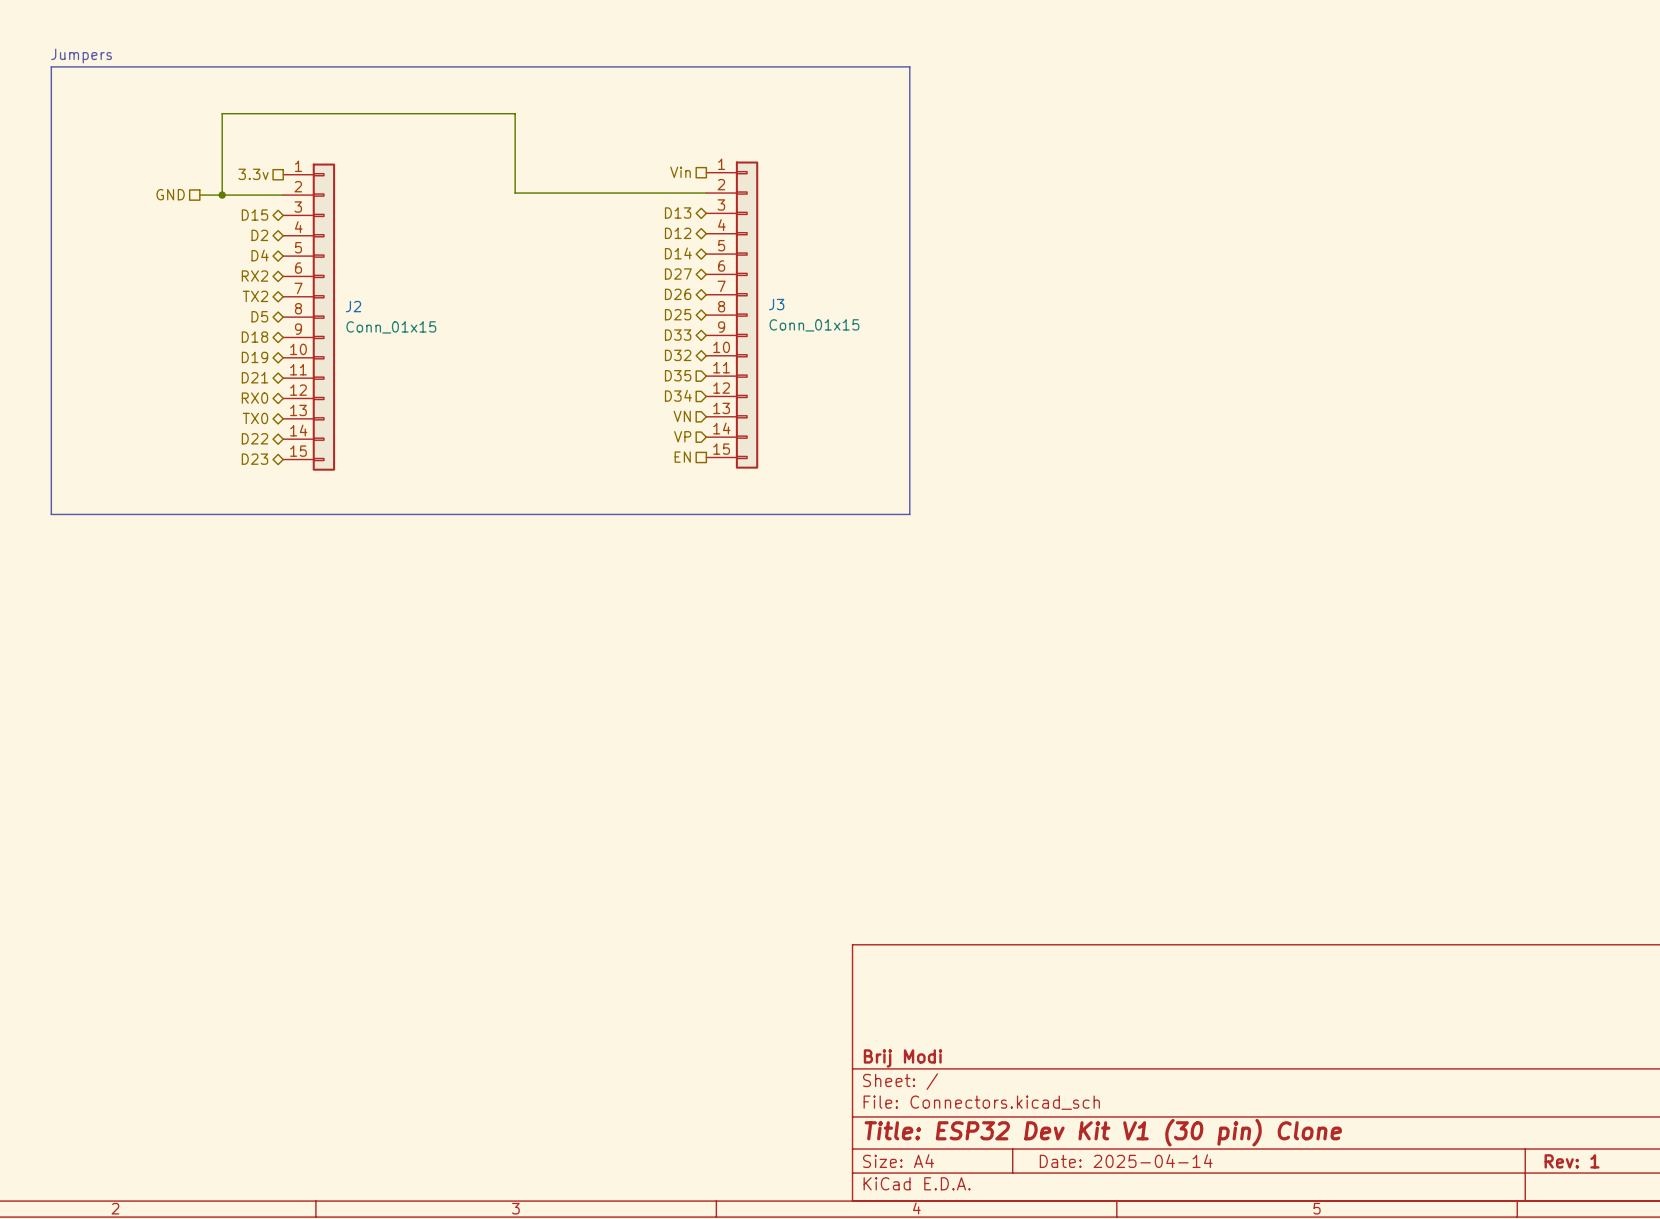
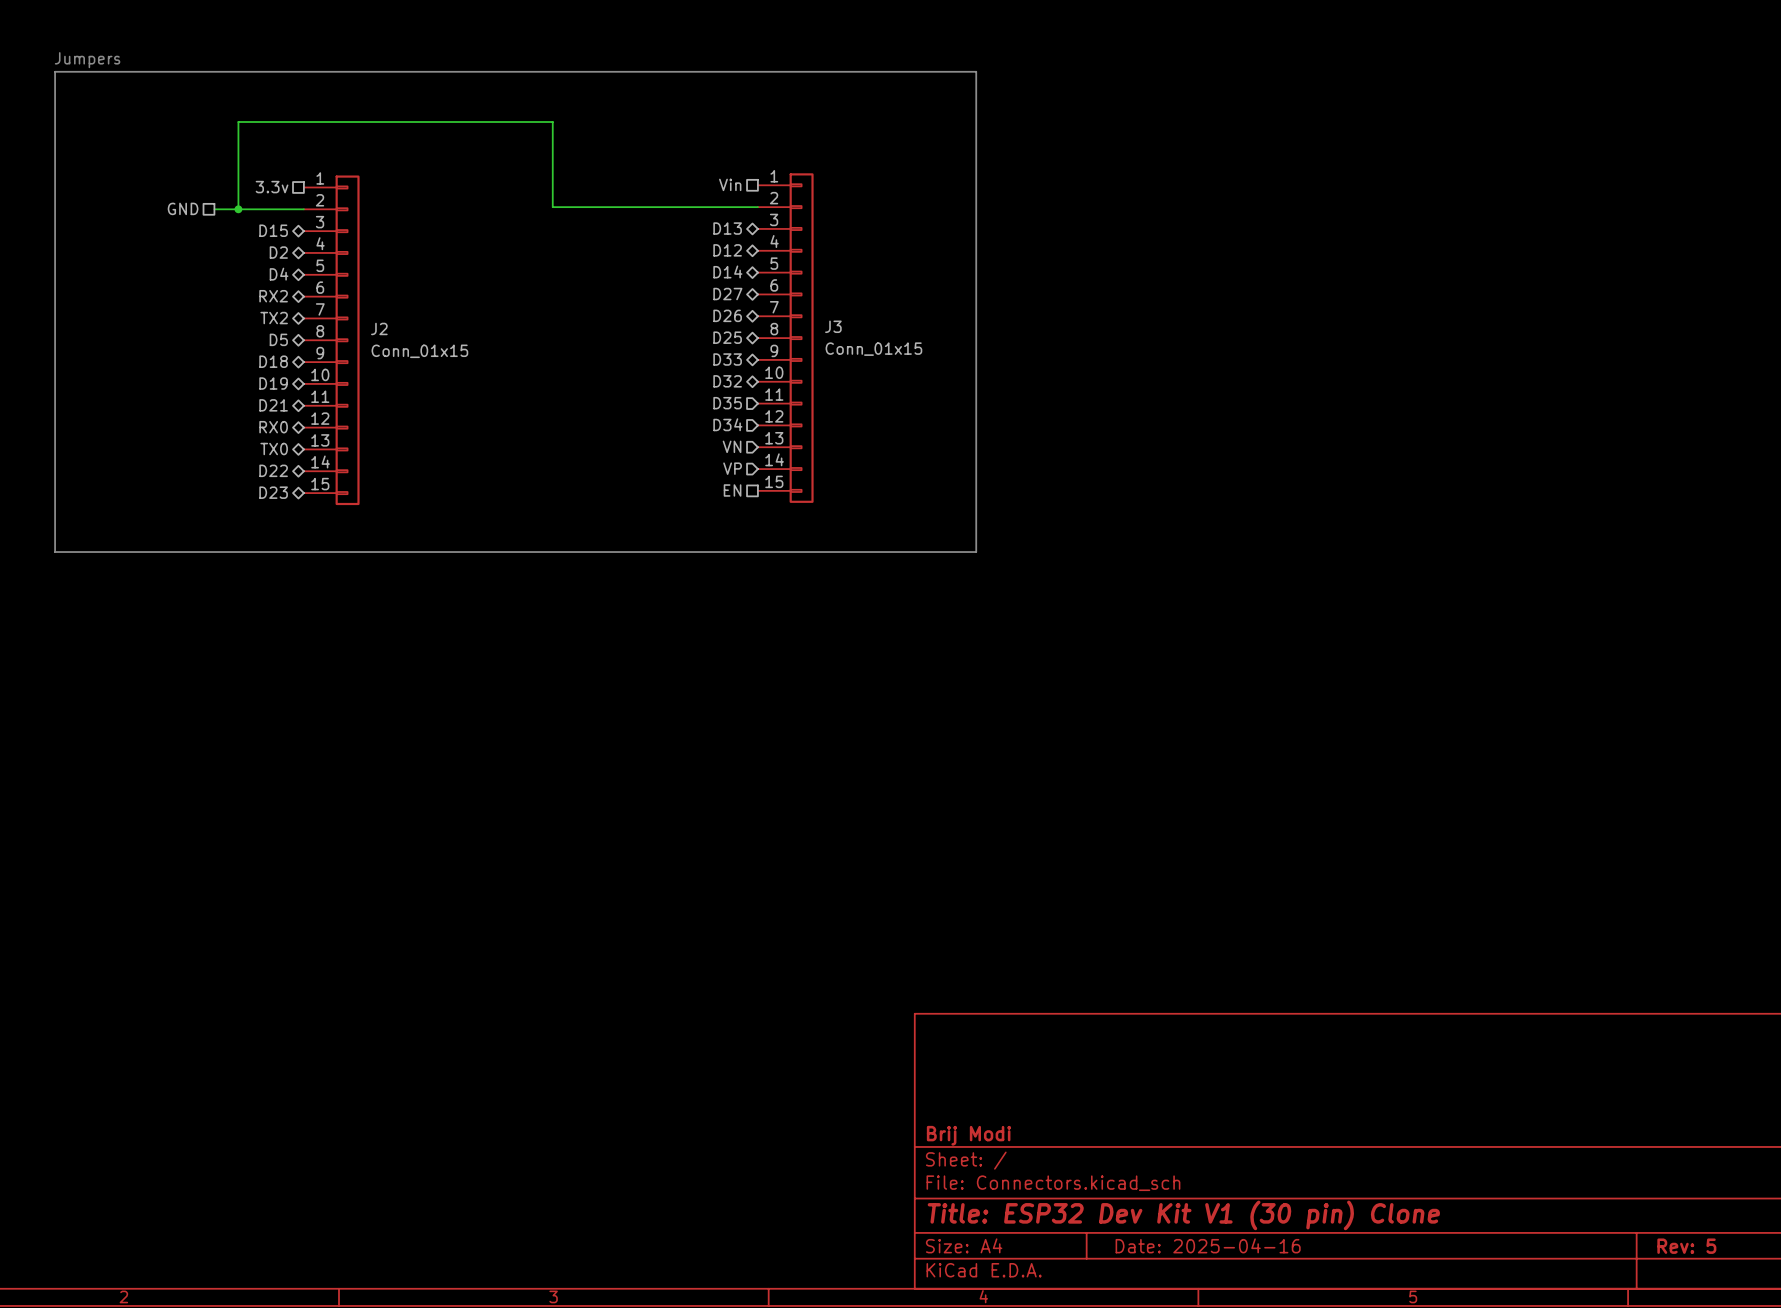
title block: Date: 2025-04-14 (1126, 1161) -> Date: 2025-04-16 (1208, 1245)
title block: Rev: 1 (1572, 1161) -> Rev: 5 (1686, 1246)

